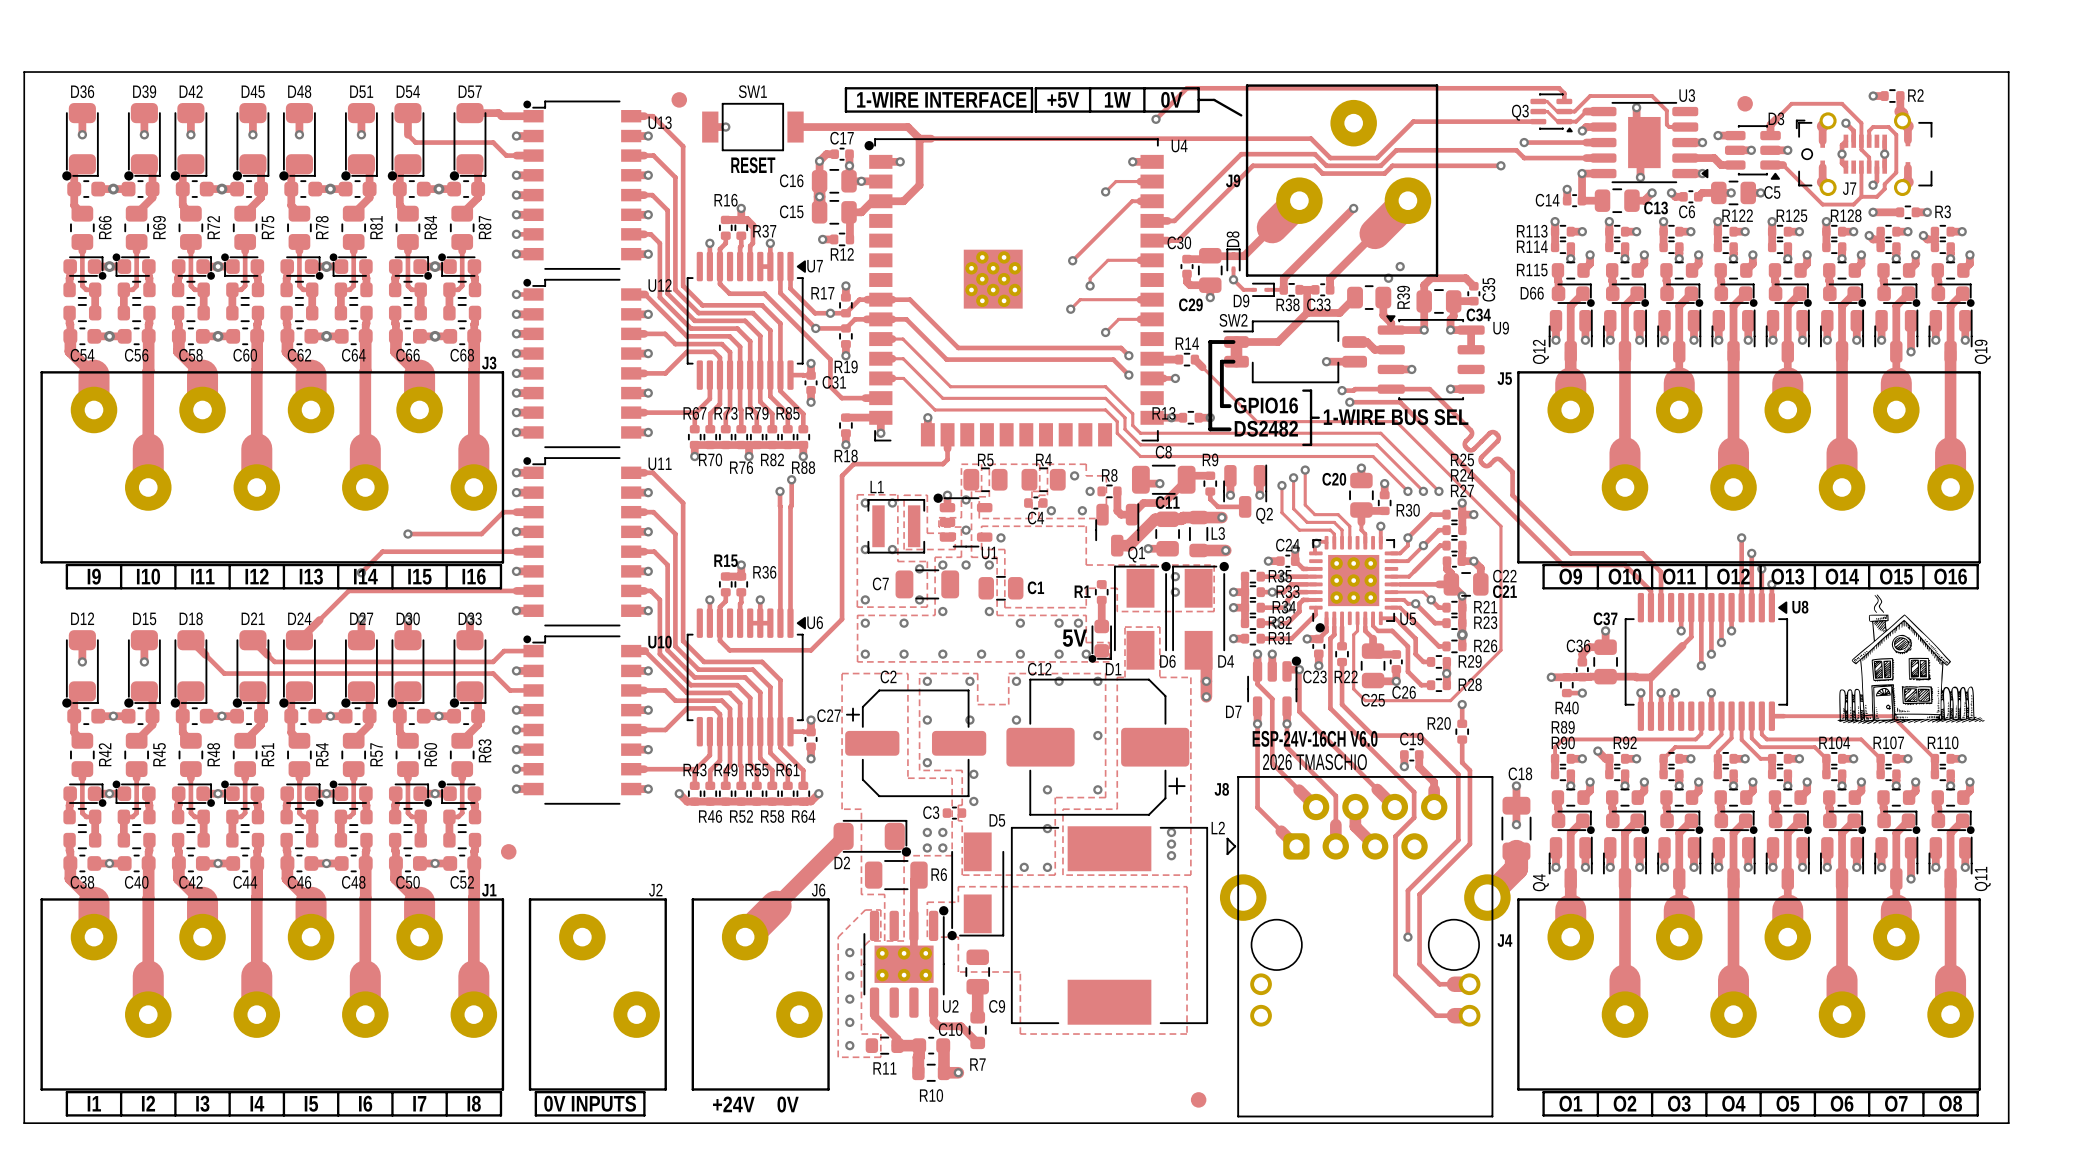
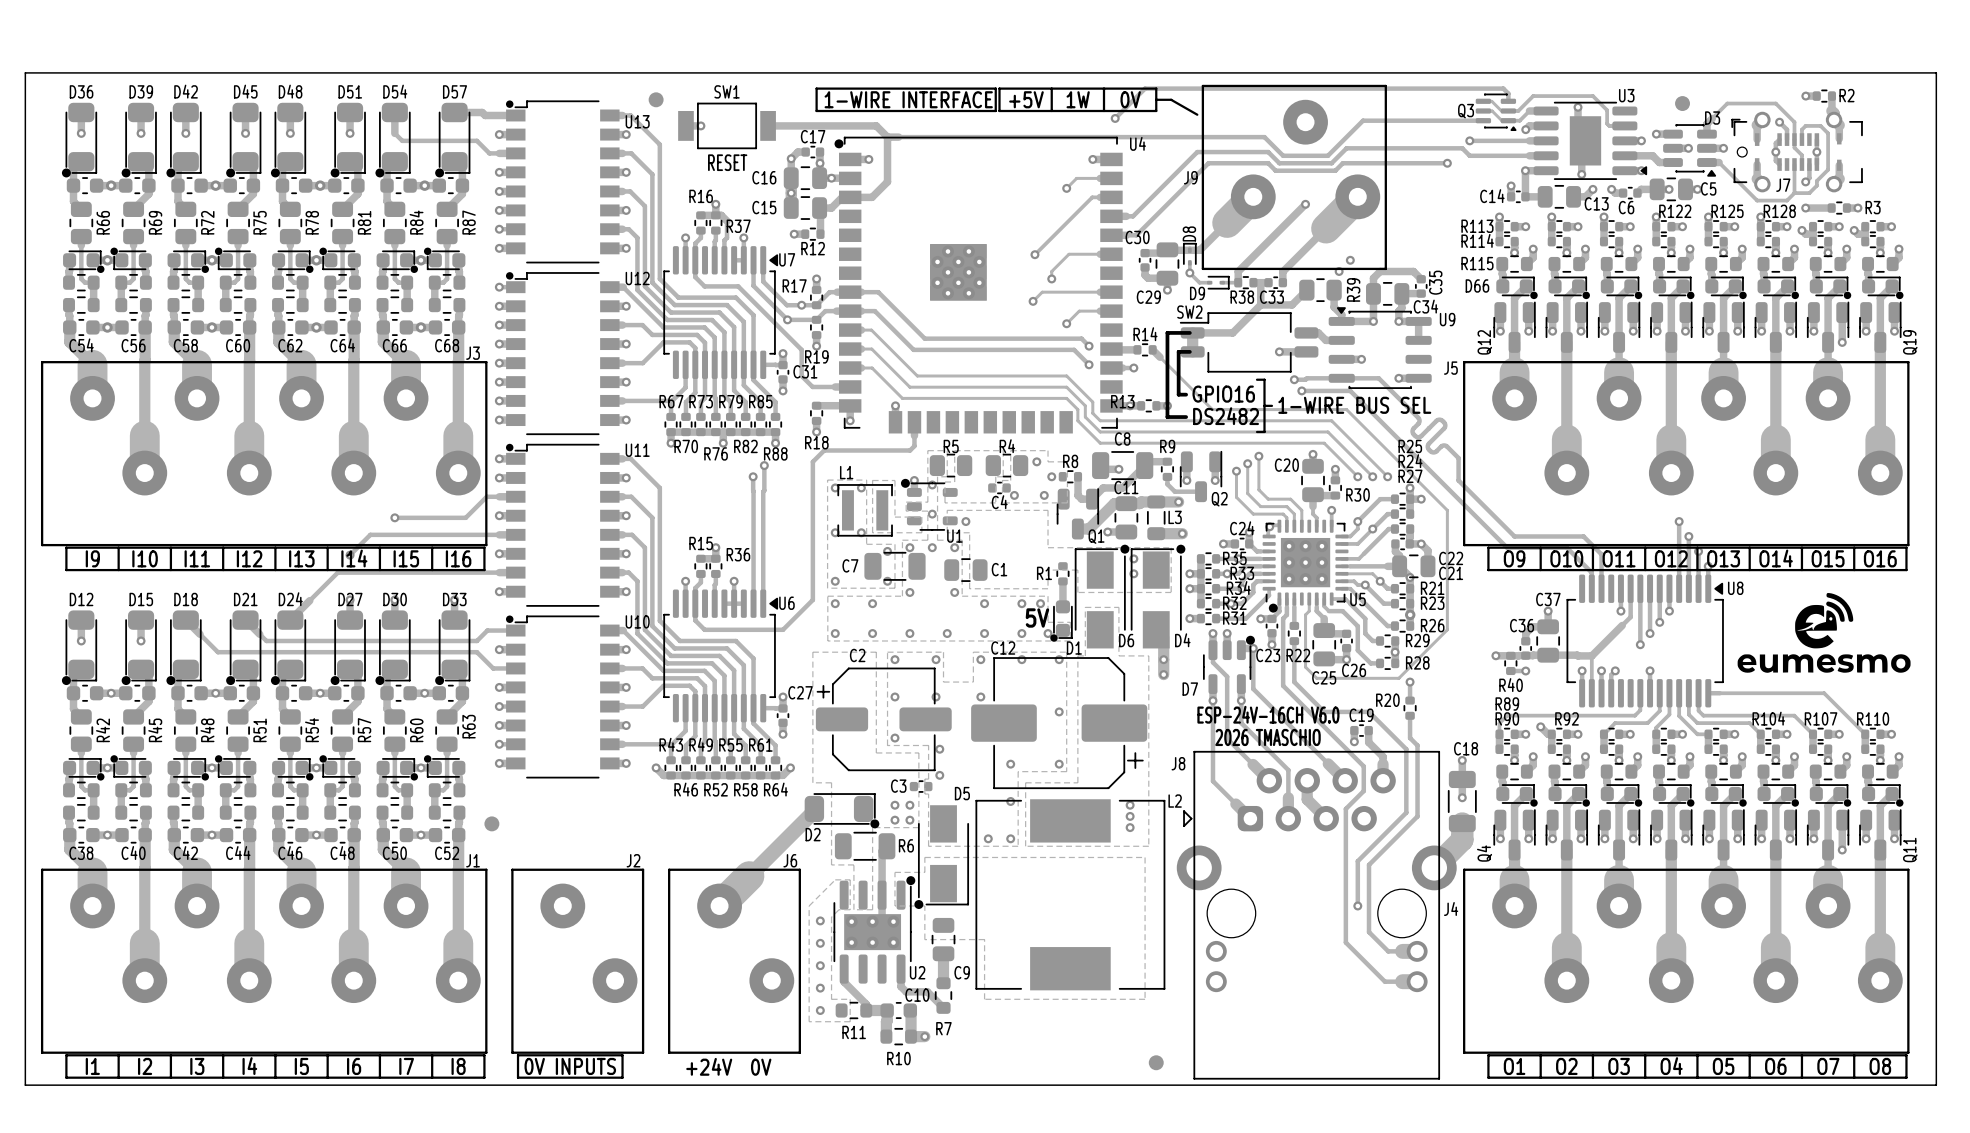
drawing: [1837, 594, 1985, 725] -> none
drawing: none -> [1737, 593, 1911, 673]

